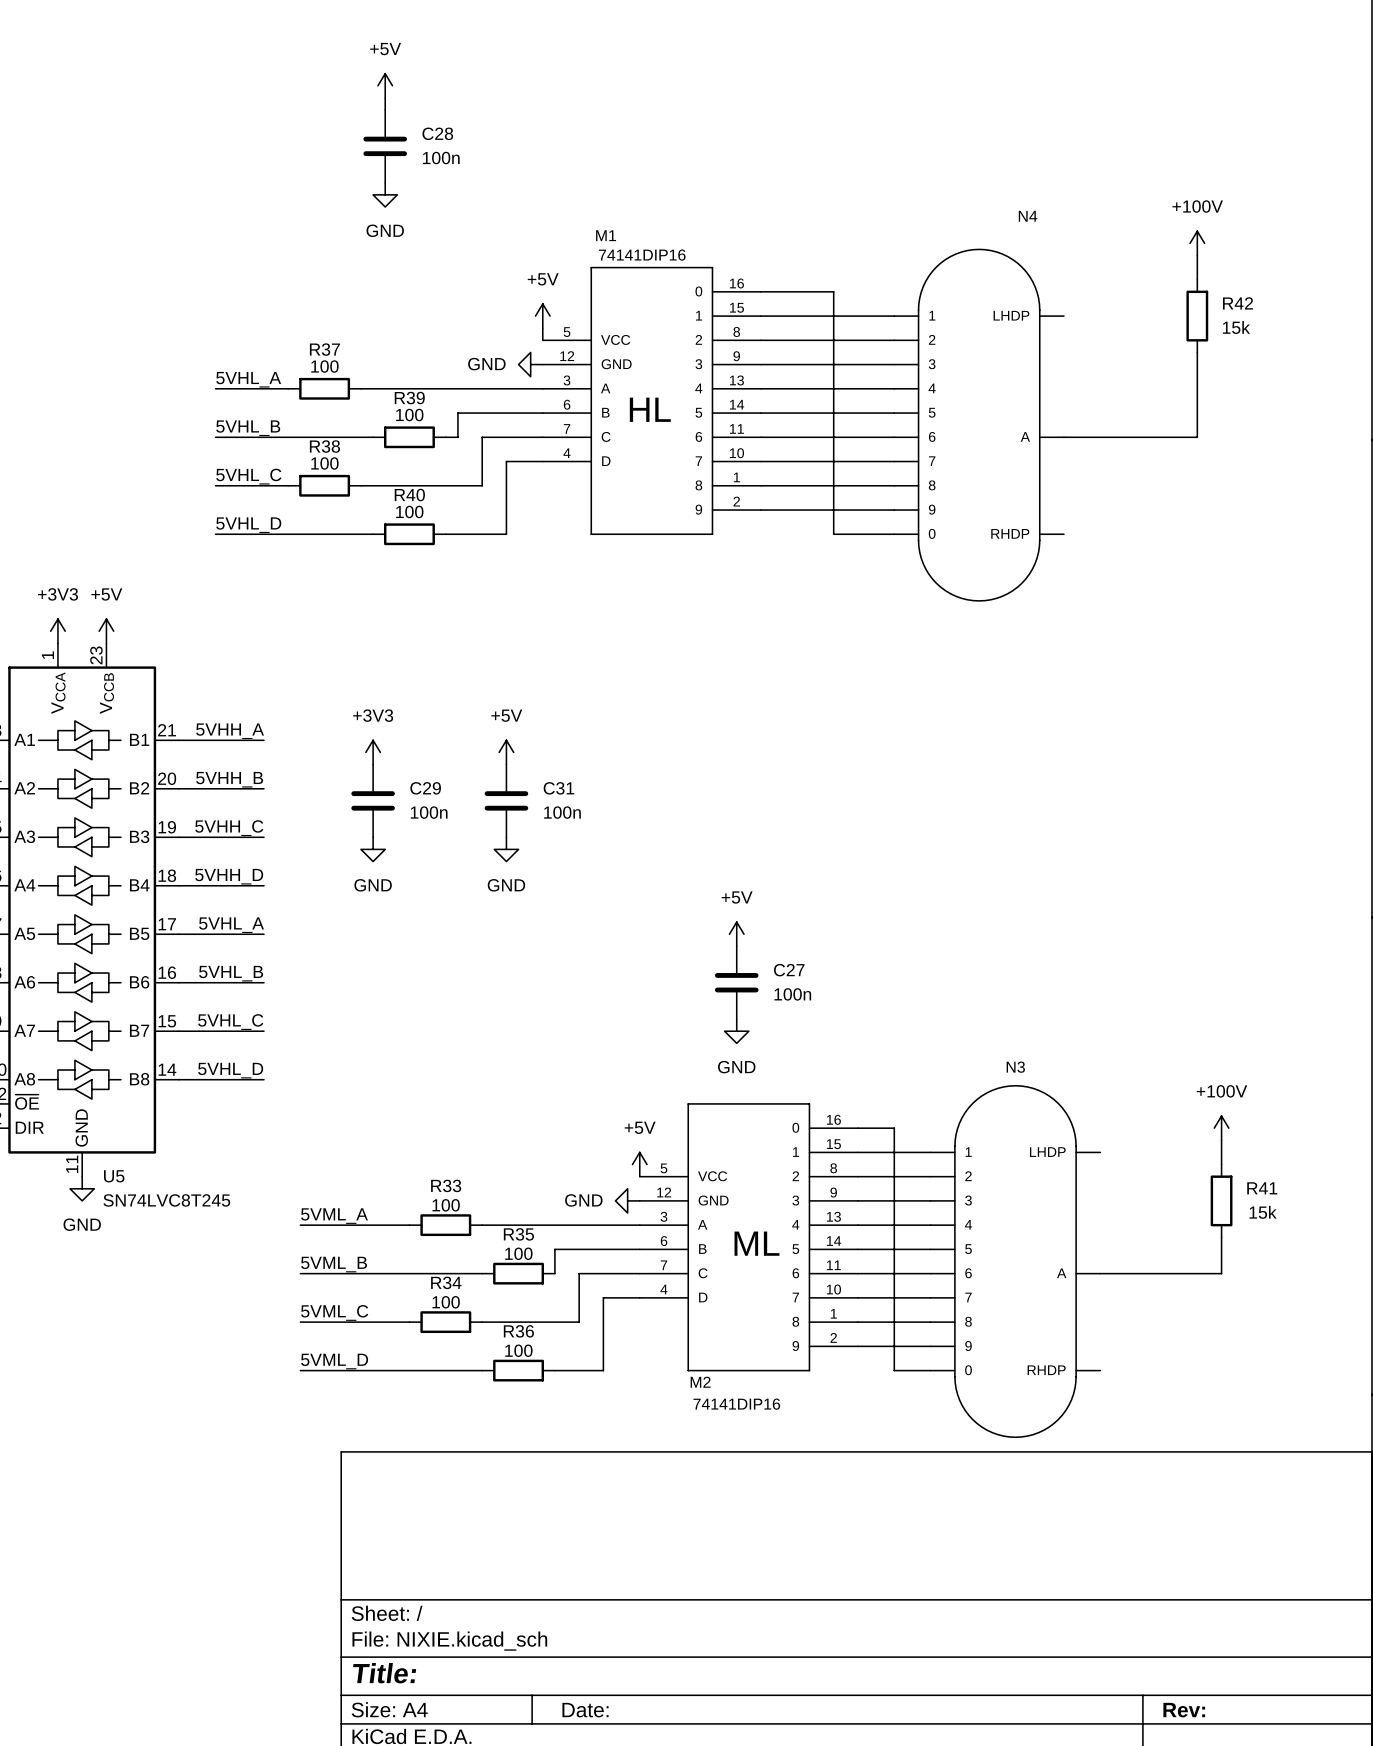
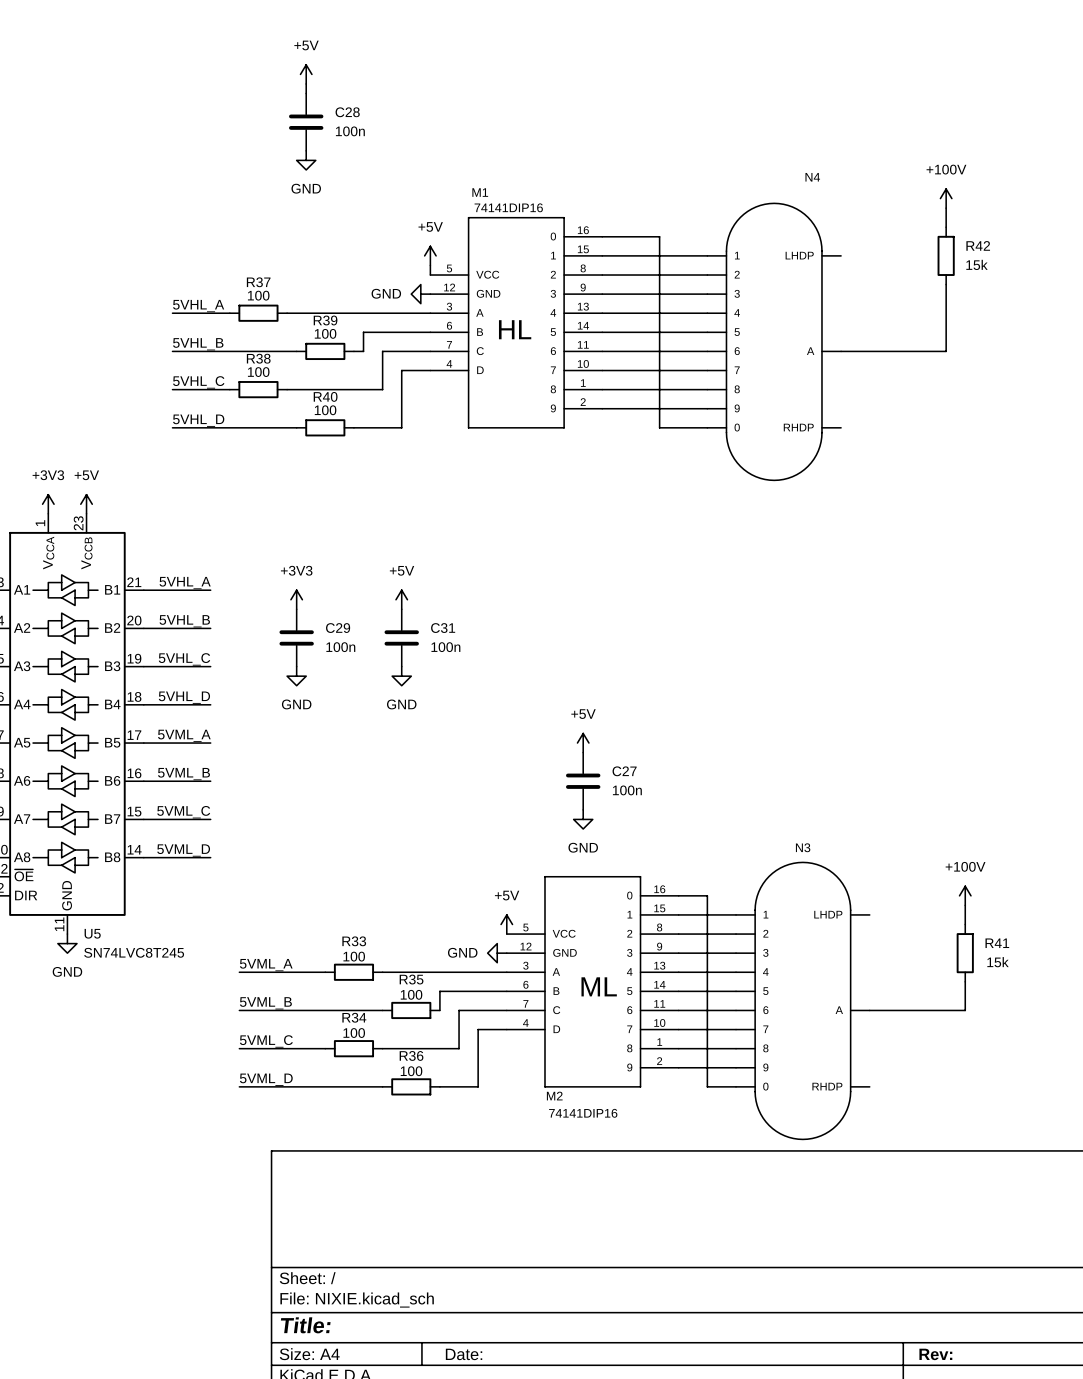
label: 5VHH_A (230, 731) -> 5VHL_A (185, 583)
label: 5VHH_B (229, 779) -> 5VHL_B (184, 621)
label: 5VHH_C (229, 828) -> 5VHL_C (184, 659)
label: 5VHH_D (229, 876) -> 5VHL_D (184, 697)
label: 5VHL_A (231, 925) -> 5VML_A (184, 735)
label: 5VHL_B (231, 973) -> 5VML_B (183, 774)
label: 5VHL_C (230, 1022) -> 5VML_C (183, 812)
label: 5VHL_D (230, 1070) -> 5VML_D (183, 850)

